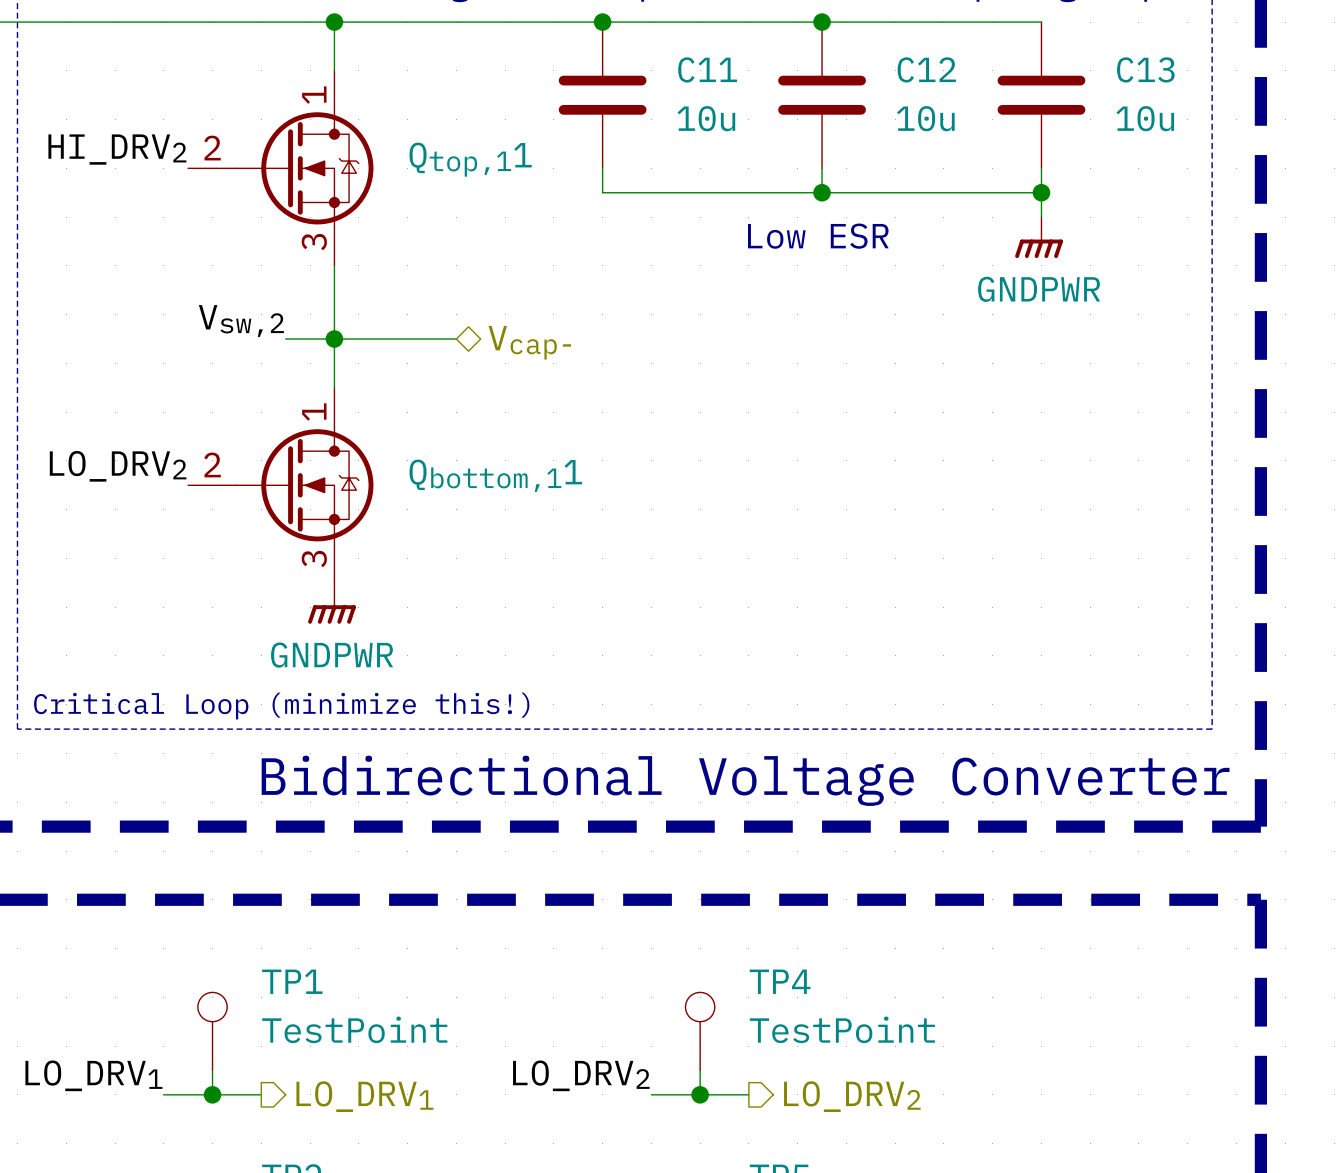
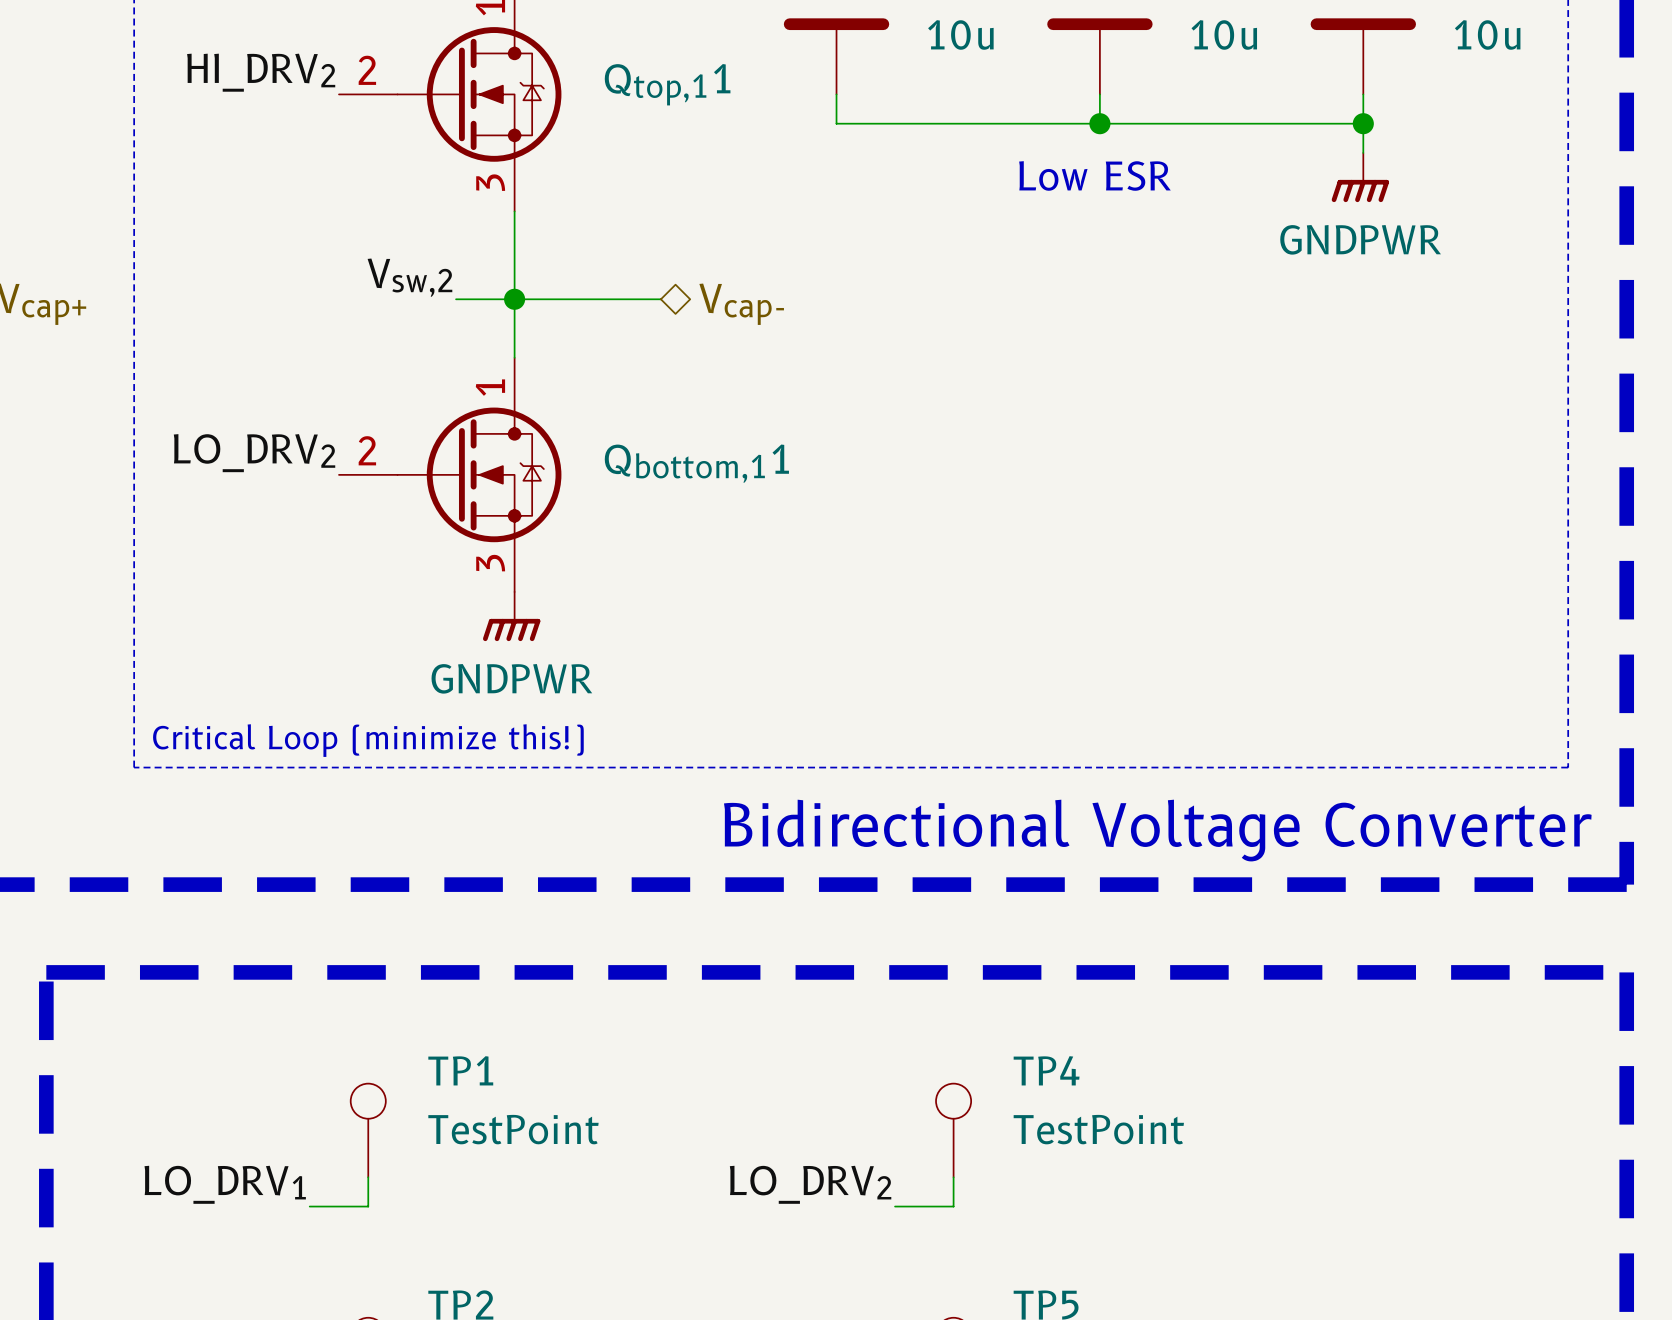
wire: (212, 1094) (261, 1094) -> none
junction: (212, 1094) -> none
wire: (700, 1094) (748, 1094) -> none
junction: (700, 1094) -> none
hierarchical label: LO_DRV1 (364, 1096) -> none
hierarchical label: LO_DRV2 (852, 1096) -> none

